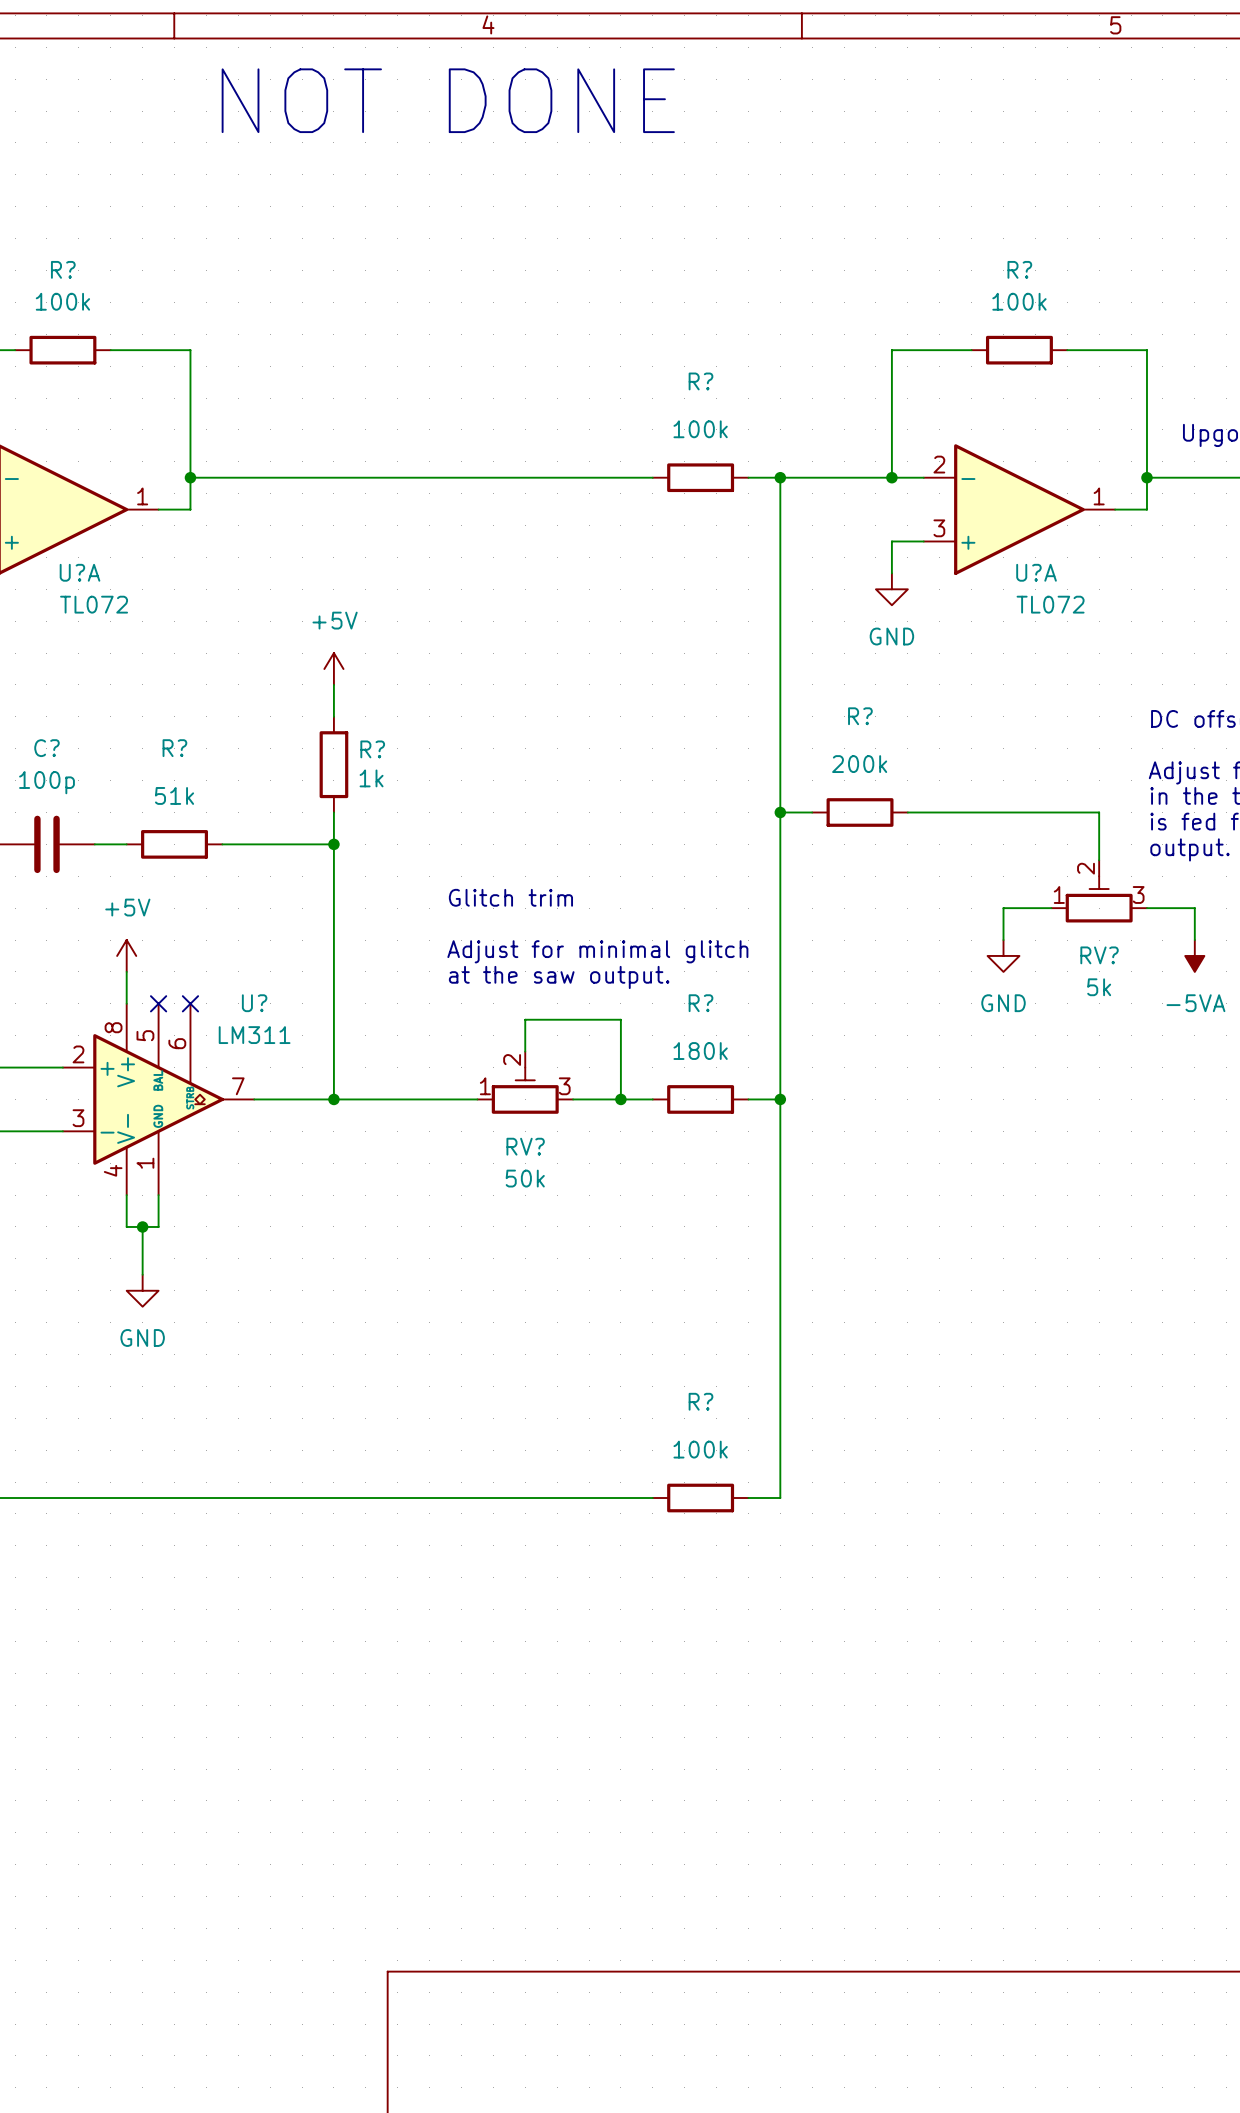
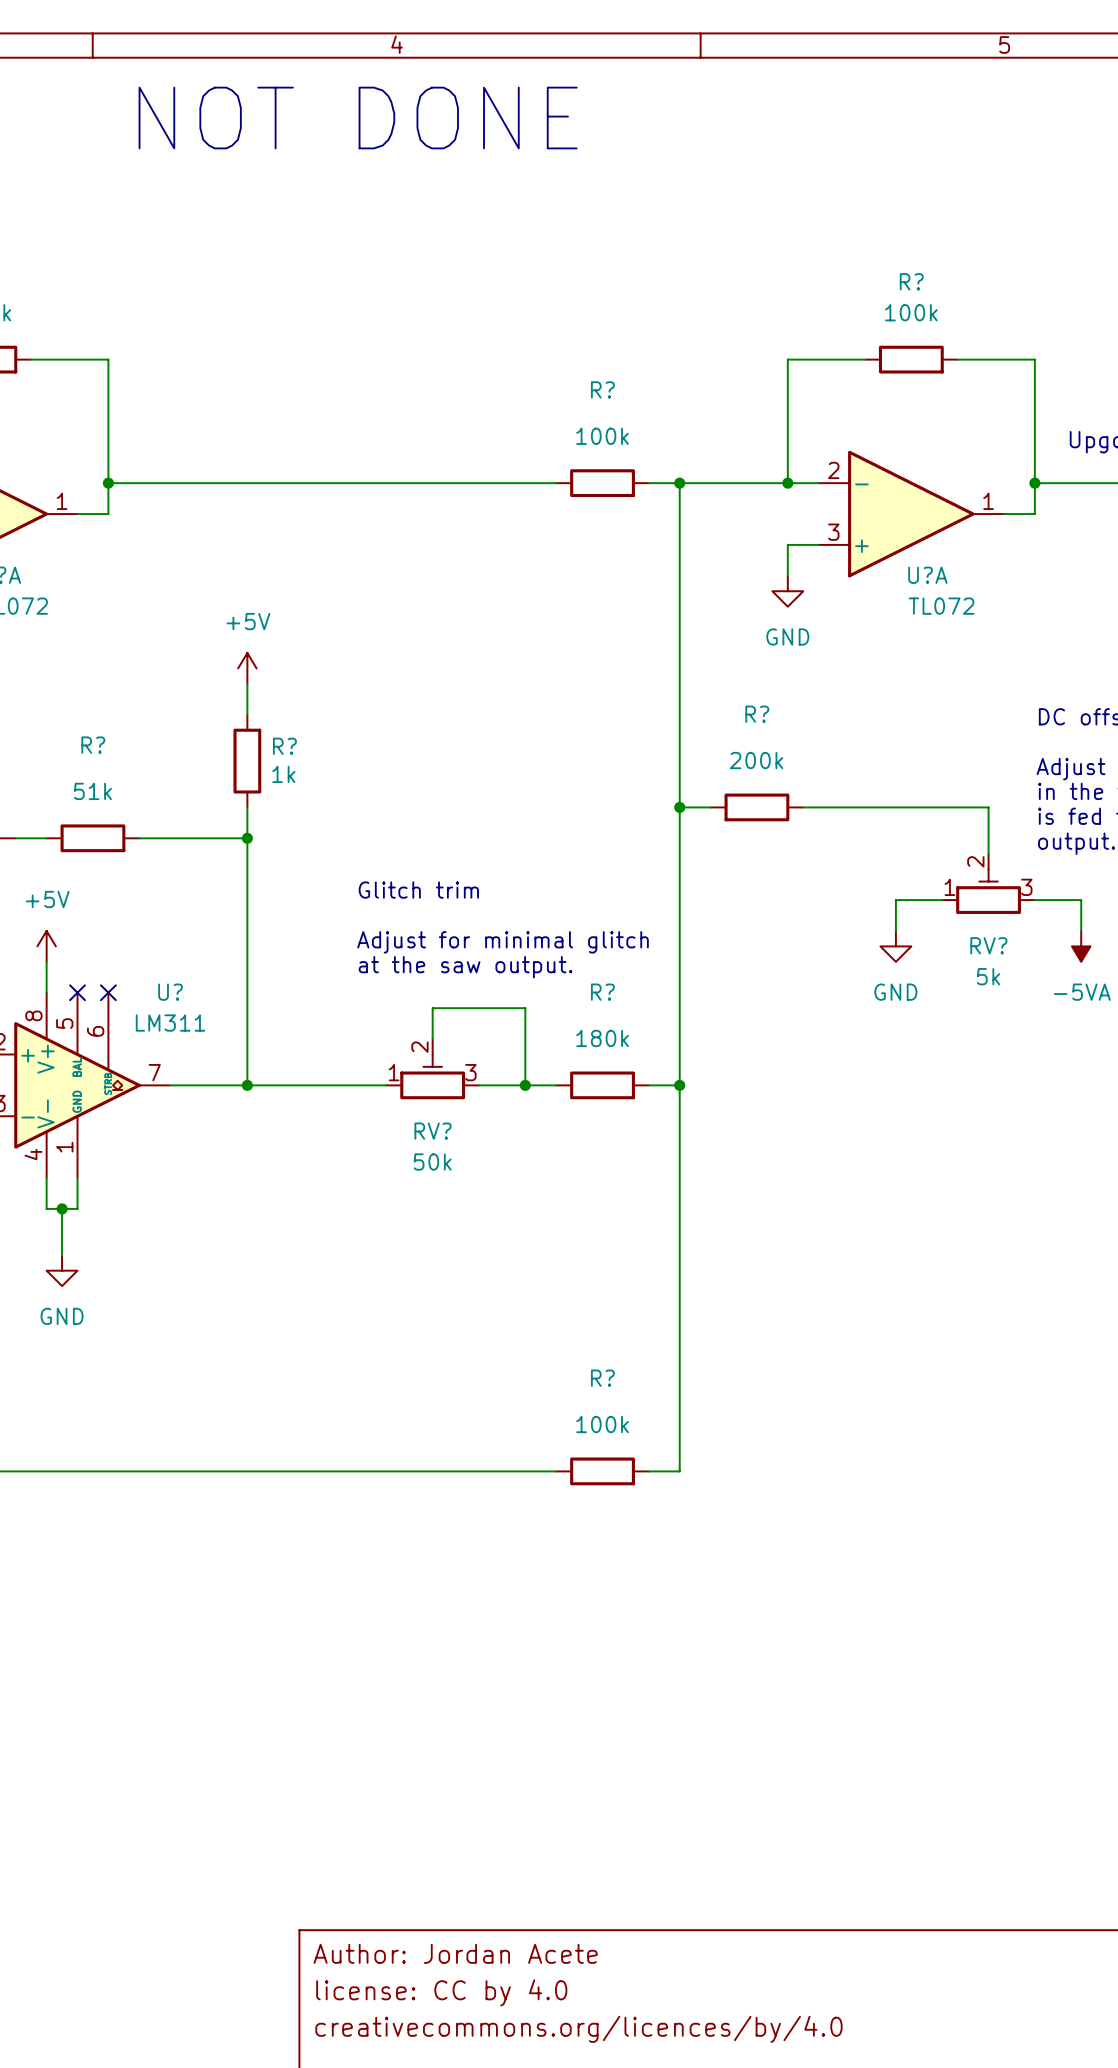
title block: none -> Author: Jordan Acete (455, 1953)
title block: none -> license: CC by 4.0 (441, 1992)
title block: none -> creativecommons.org/licences/by/4.0 (578, 2029)

